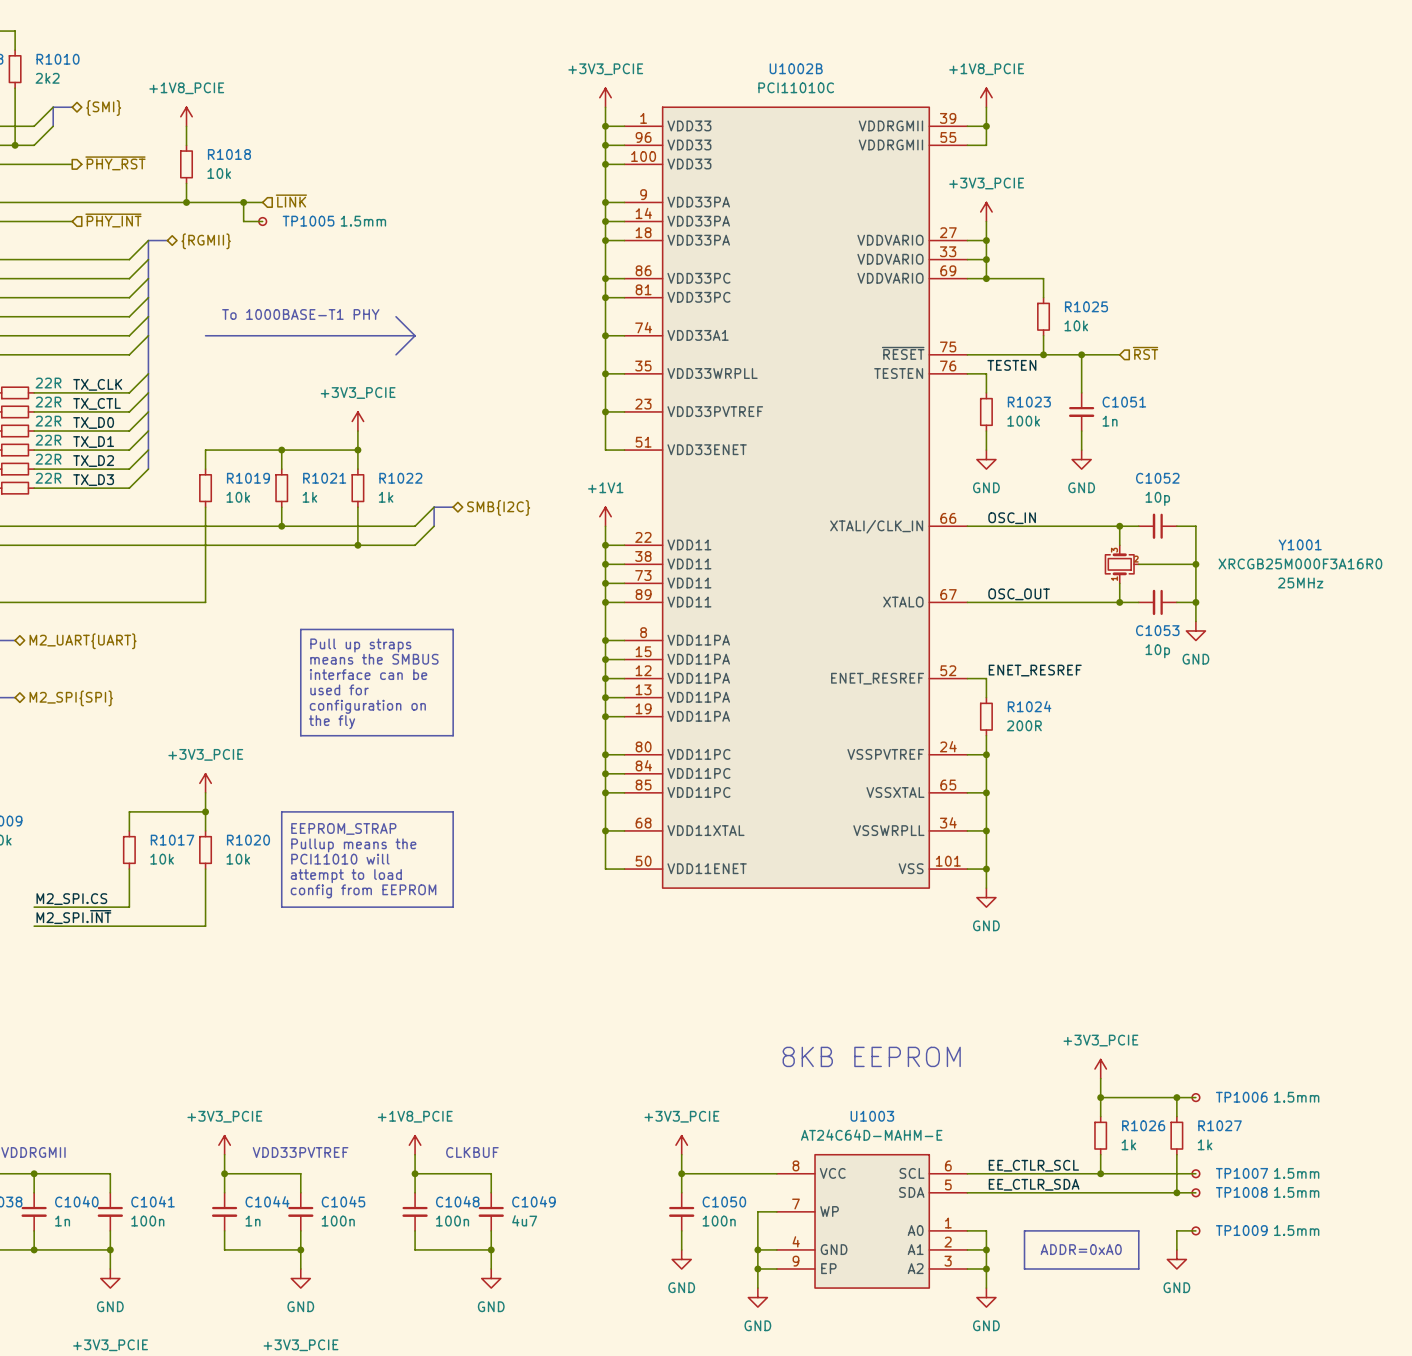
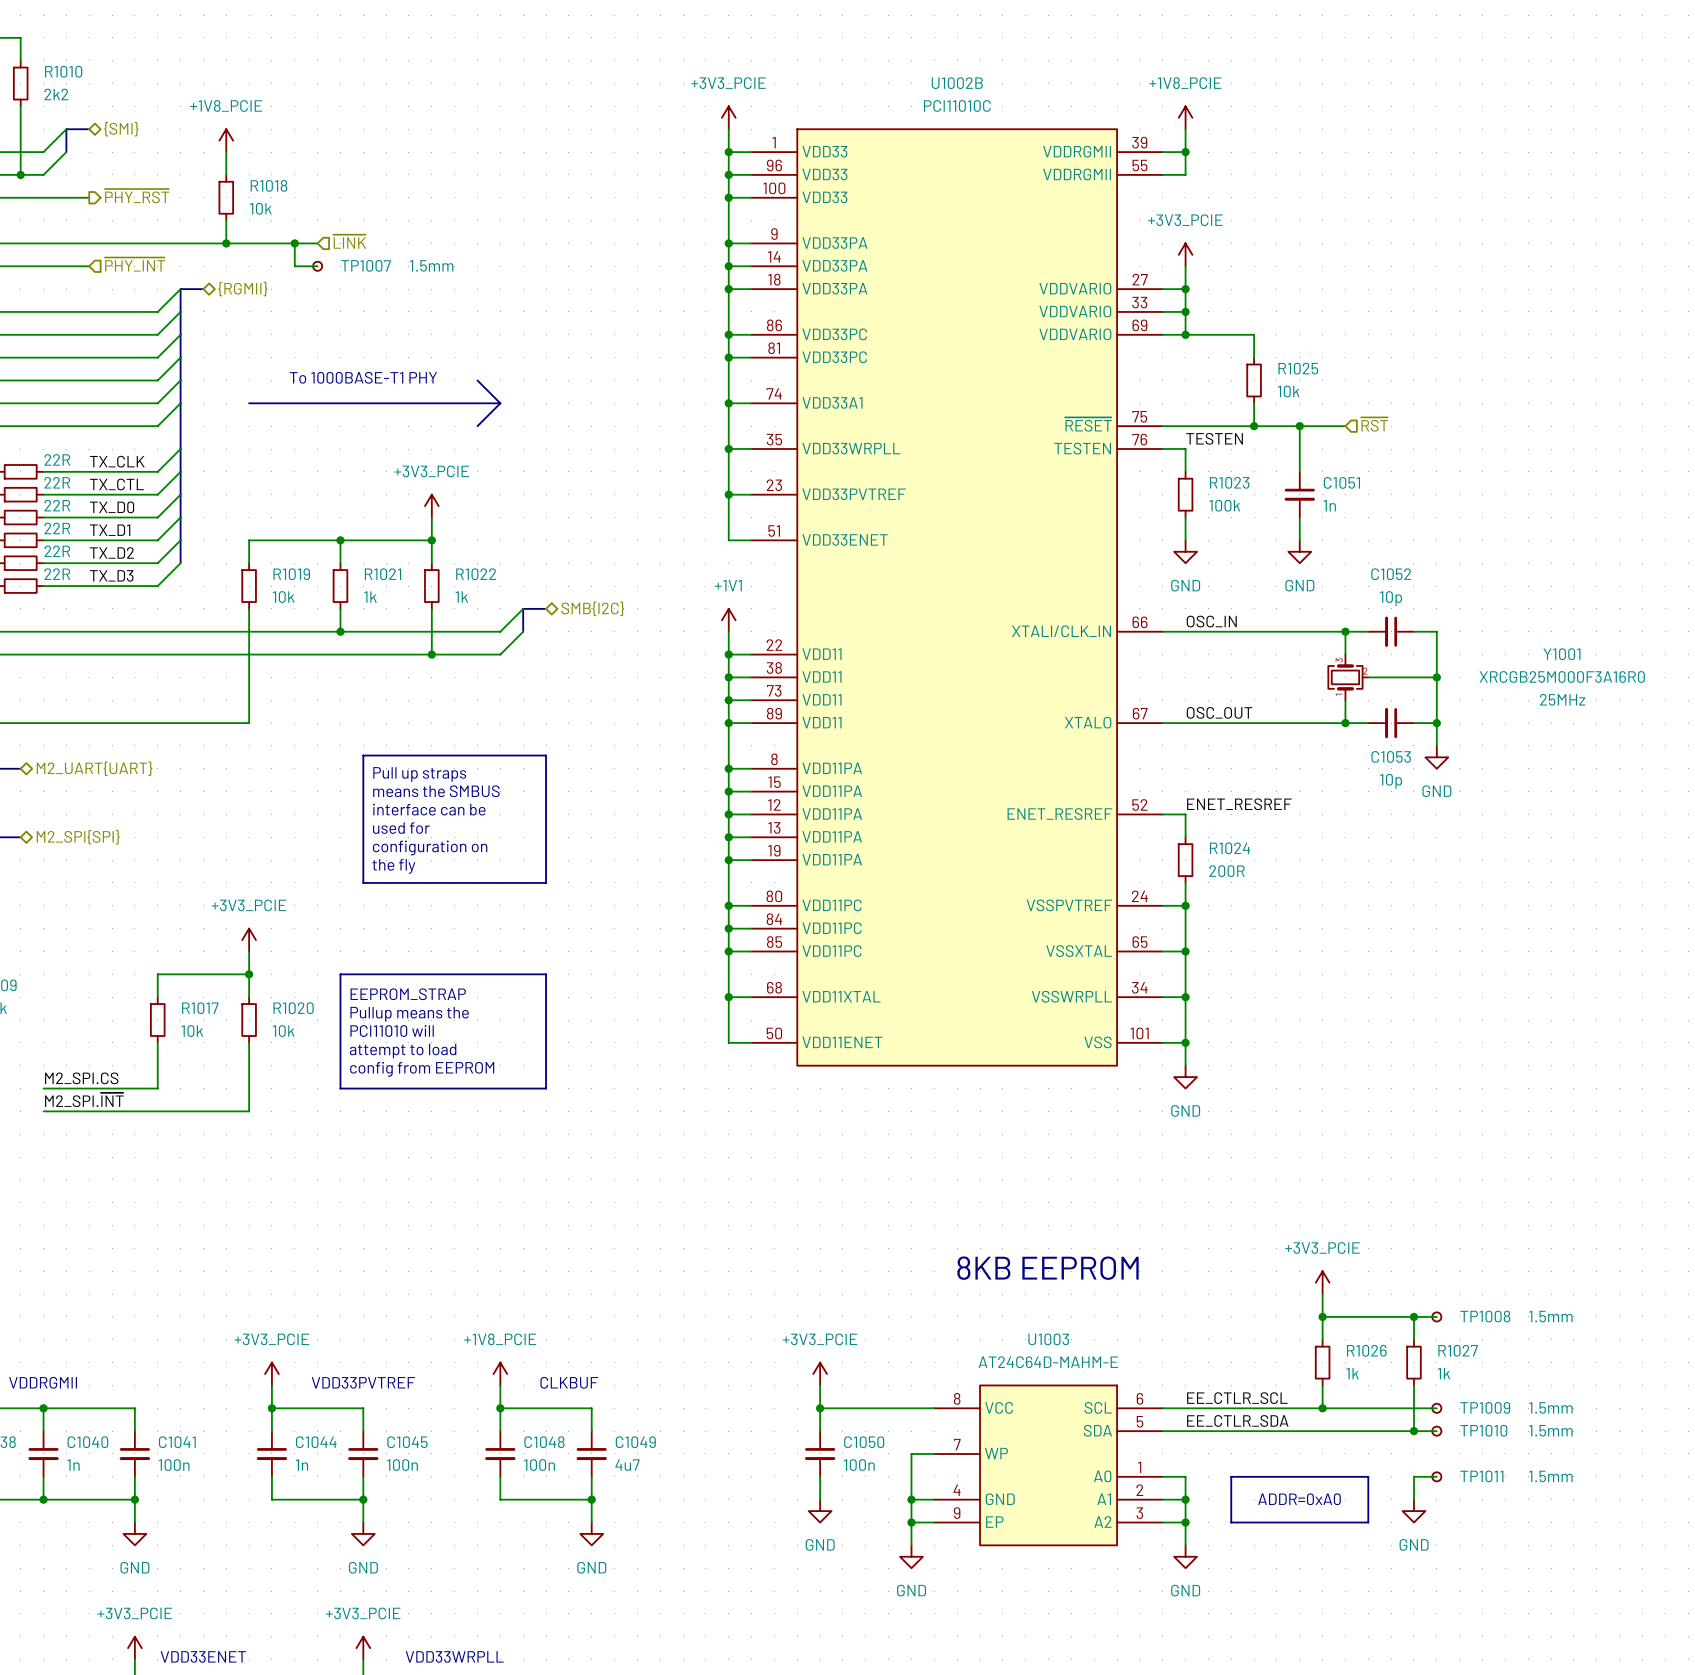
TP1005 name: TP1005 (308, 221) -> TP1007 (366, 265)
TP1006 name: TP1006 (1241, 1097) -> TP1008 (1485, 1316)
TP1007 name: TP1007 (1242, 1173) -> TP1009 (1485, 1407)
TP1008 name: TP1008 (1241, 1192) -> TP1010 (1483, 1430)
TP1009 name: TP1009 (1241, 1230) -> TP1011 (1481, 1476)

